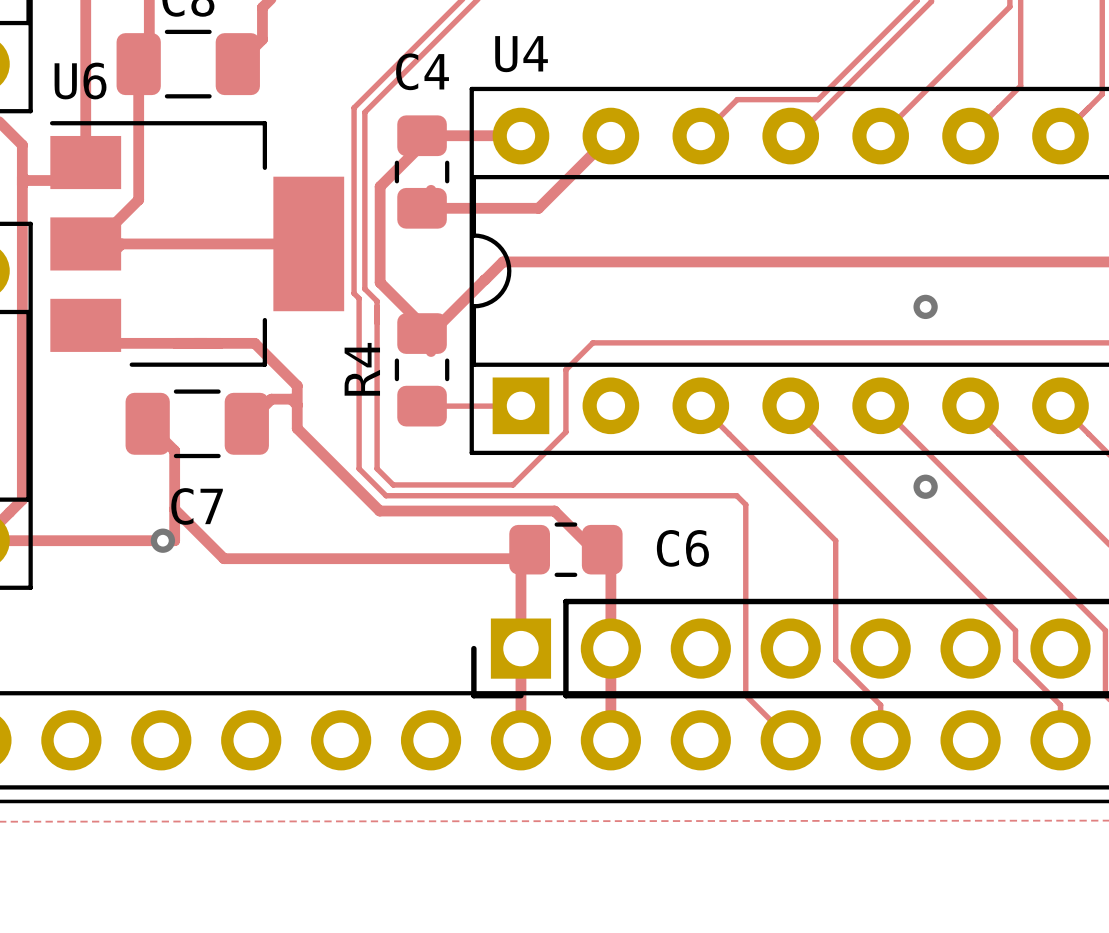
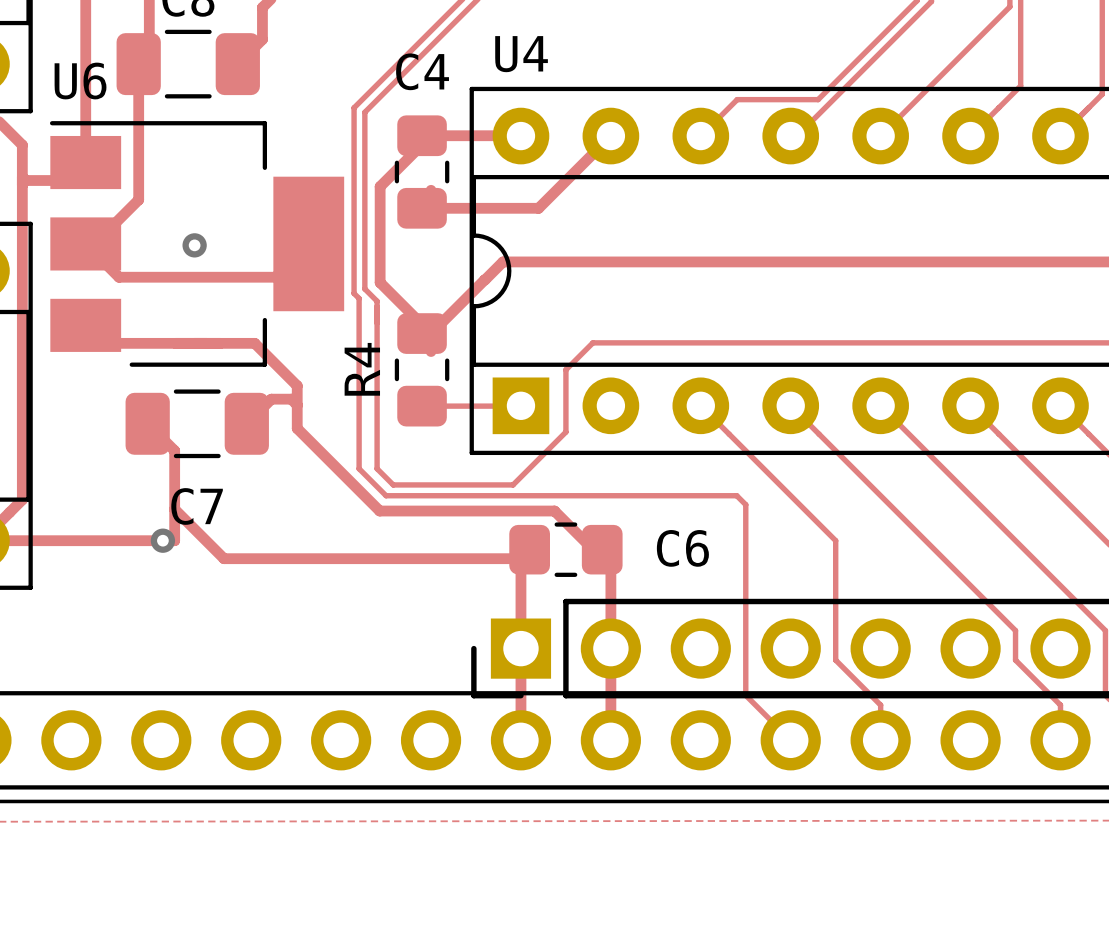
track: (308, 243) (121, 243) (103, 261) -> (308, 243) (275, 277) (119, 277) (103, 261)
via: none -> (194, 245)
via: (925, 306) -> none
via: (925, 486) -> none

